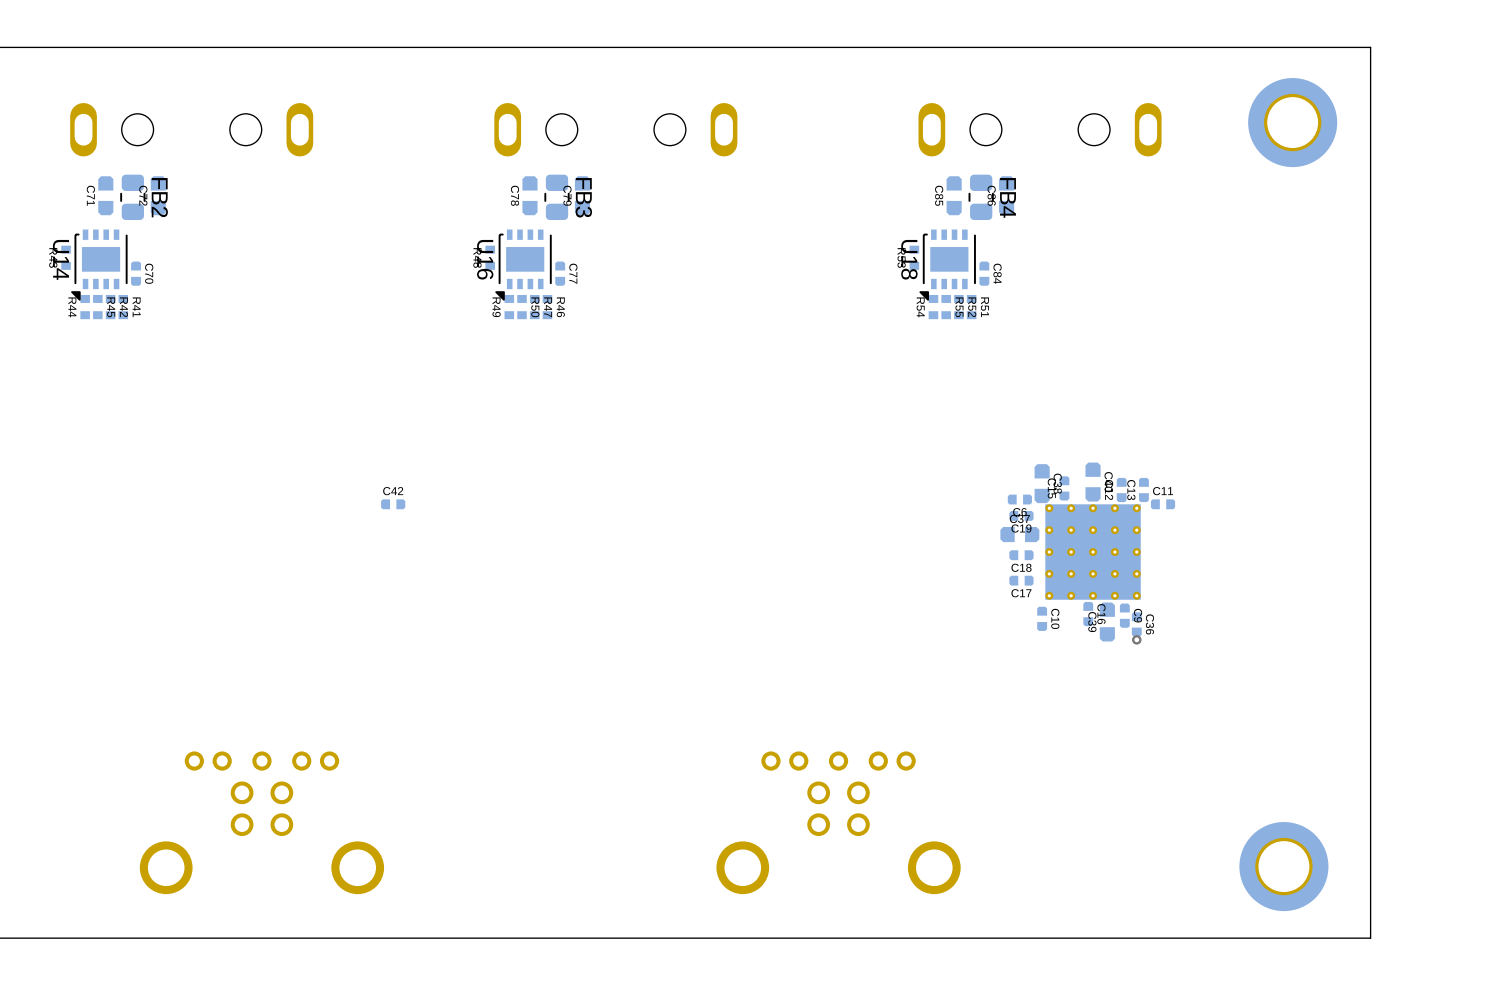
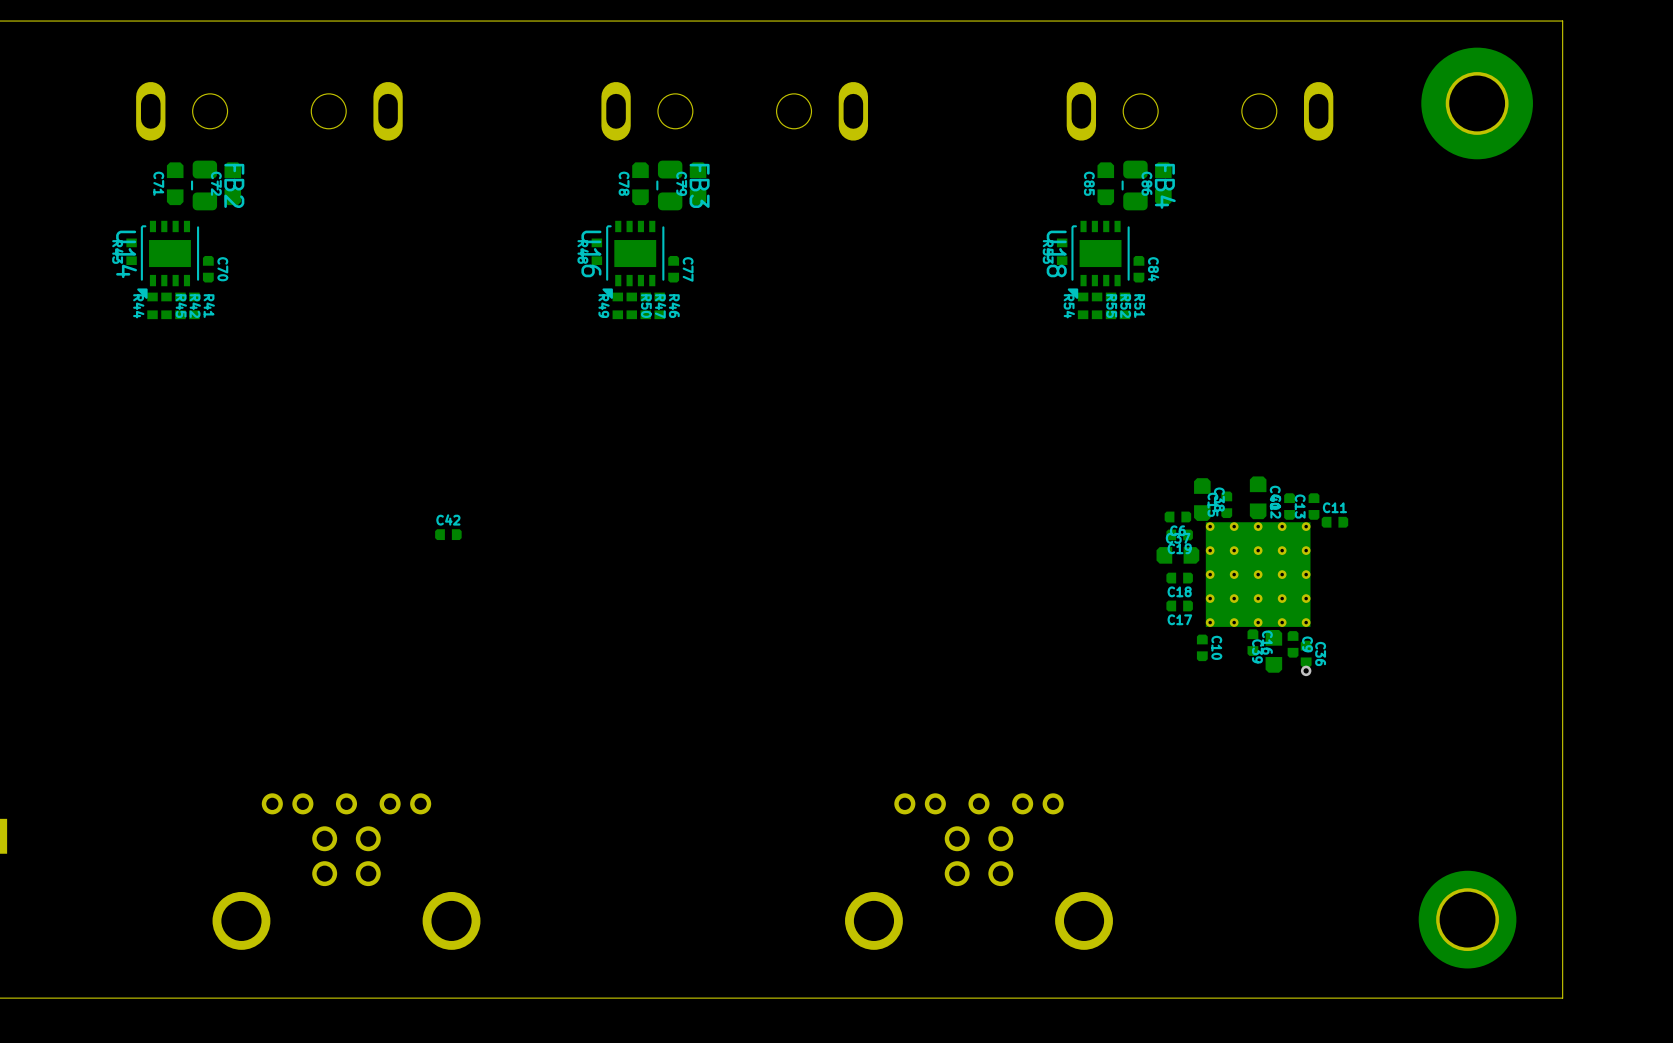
part footprint: [1248, 78, 1338, 168] -> [1421, 47, 1533, 160]
C42 position: (393, 504) -> (448, 534)

